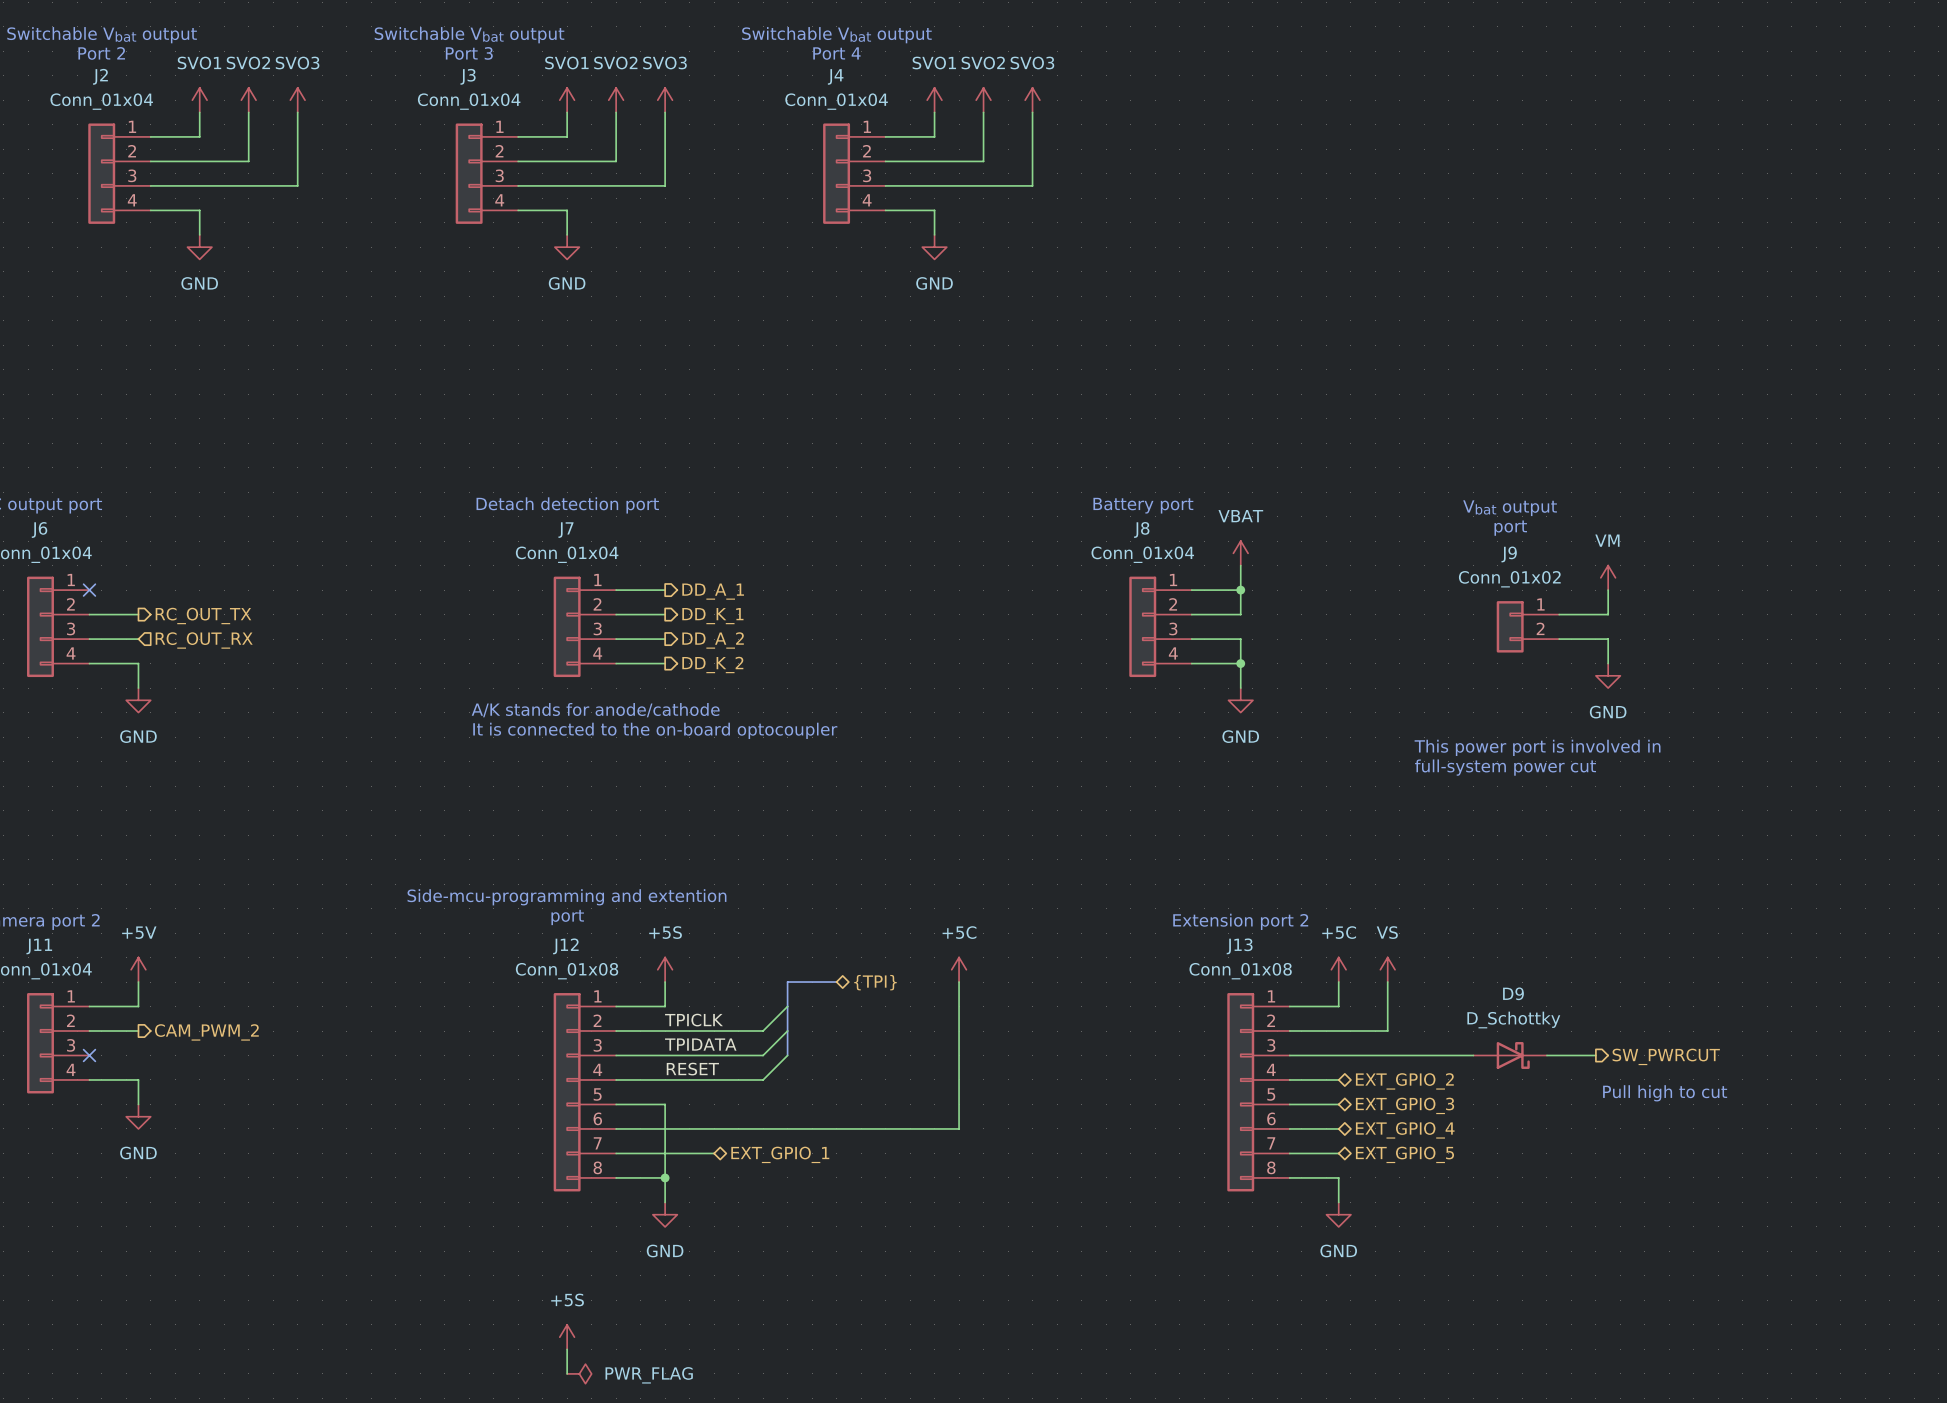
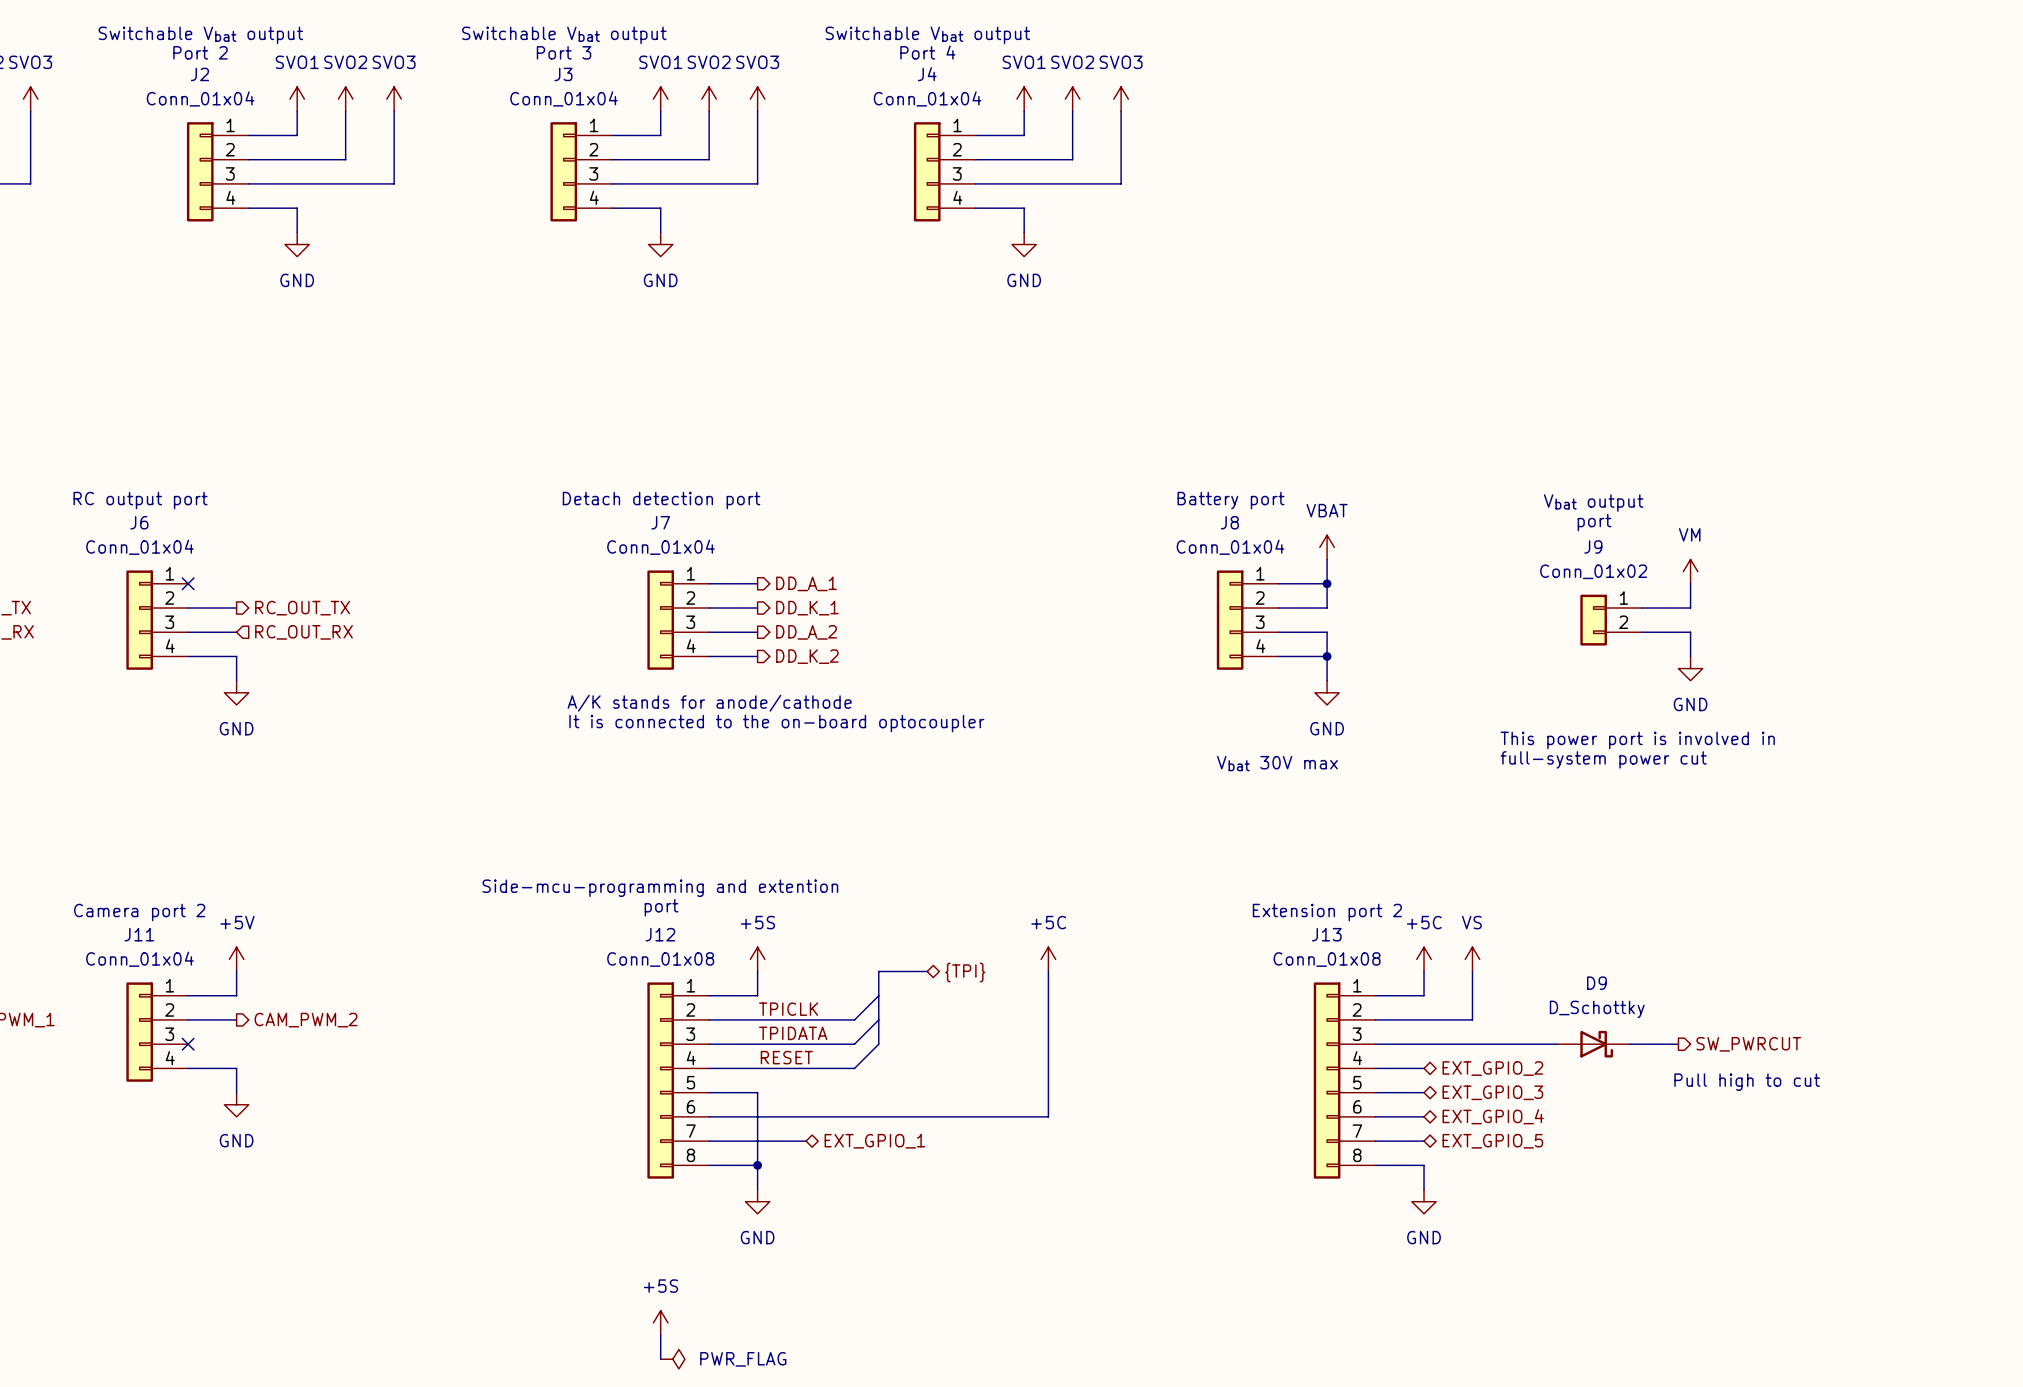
text: none -> Vbat 30V max (1277, 763)

